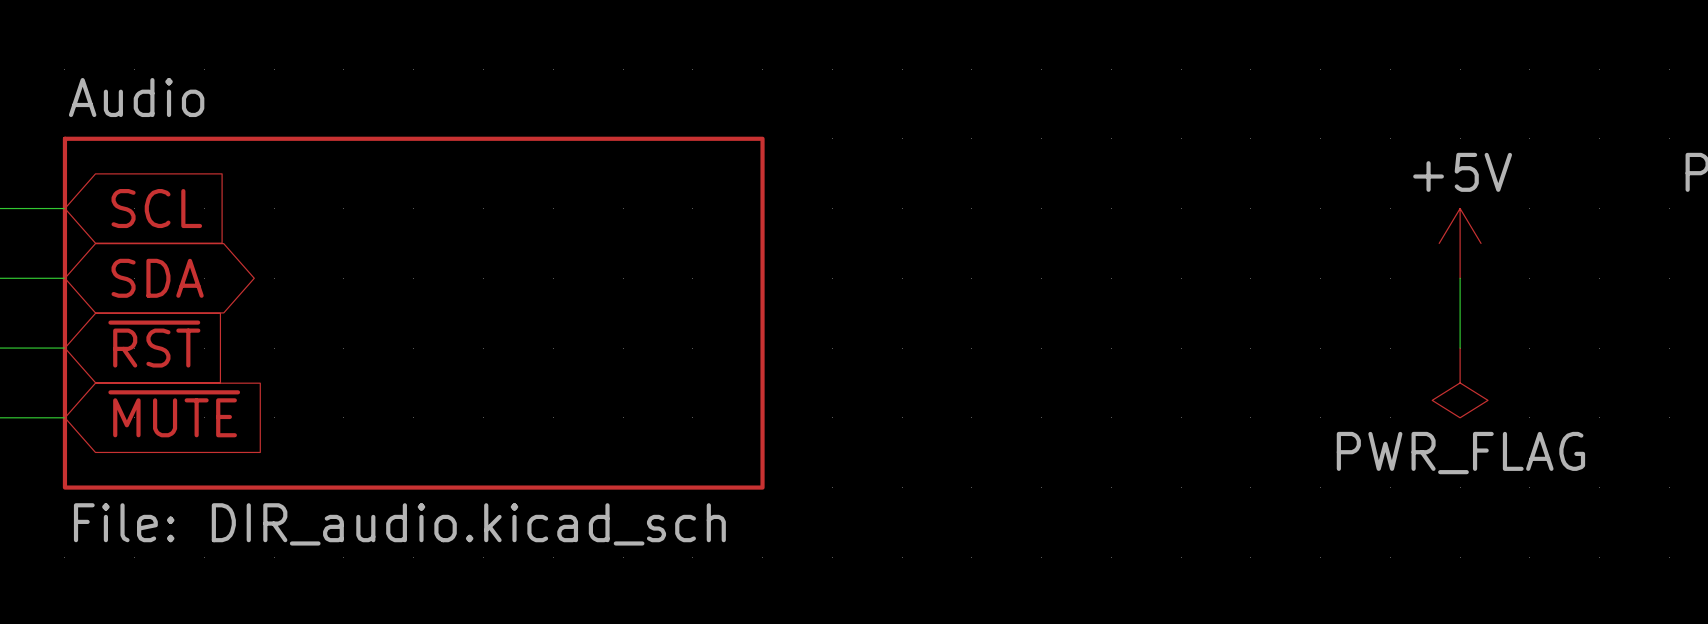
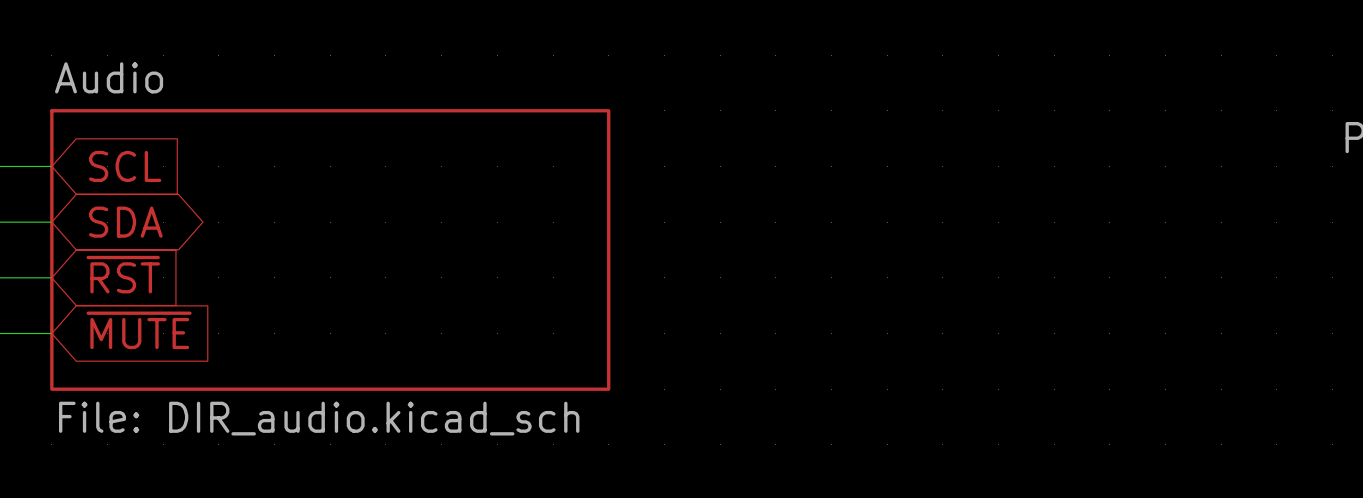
power symbol: +5V (1460, 243) -> none
wire: (1460, 278) (1460, 348) -> none
power symbol: PWR_FLAG (1460, 382) -> none

